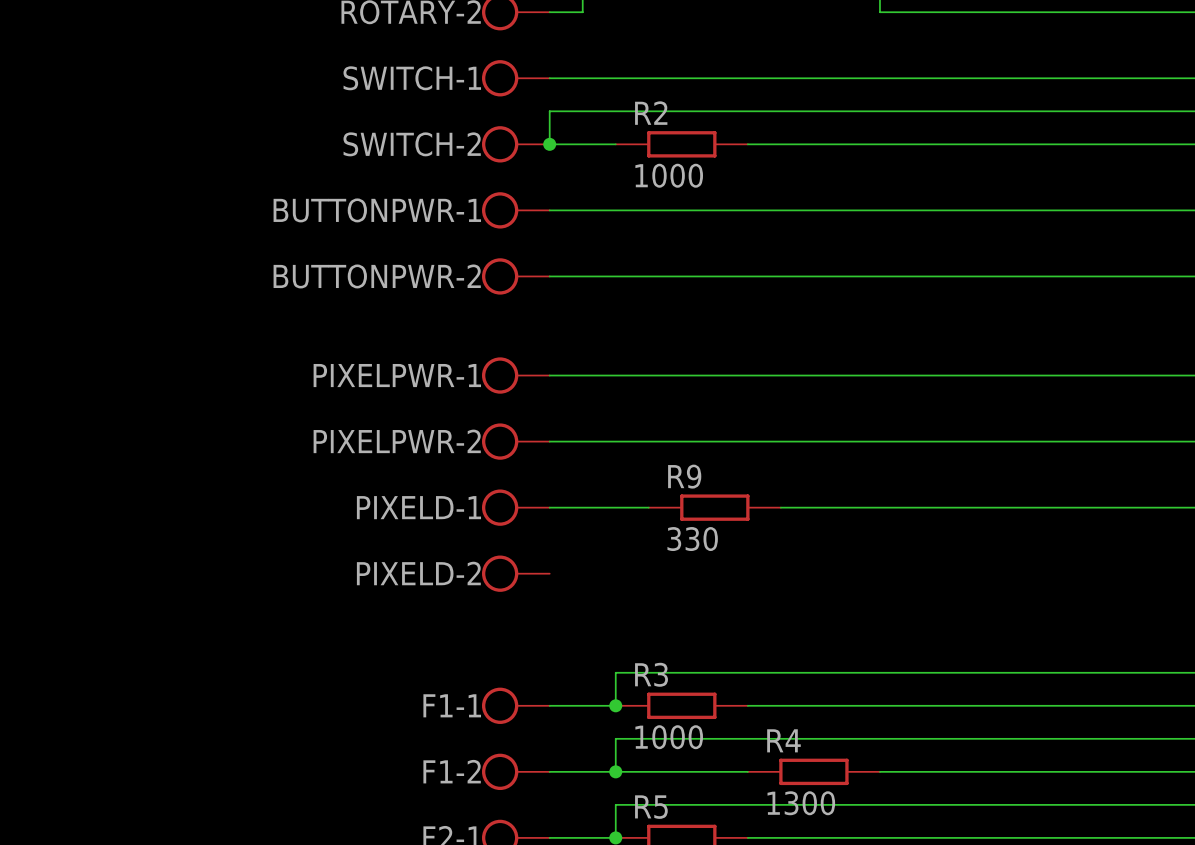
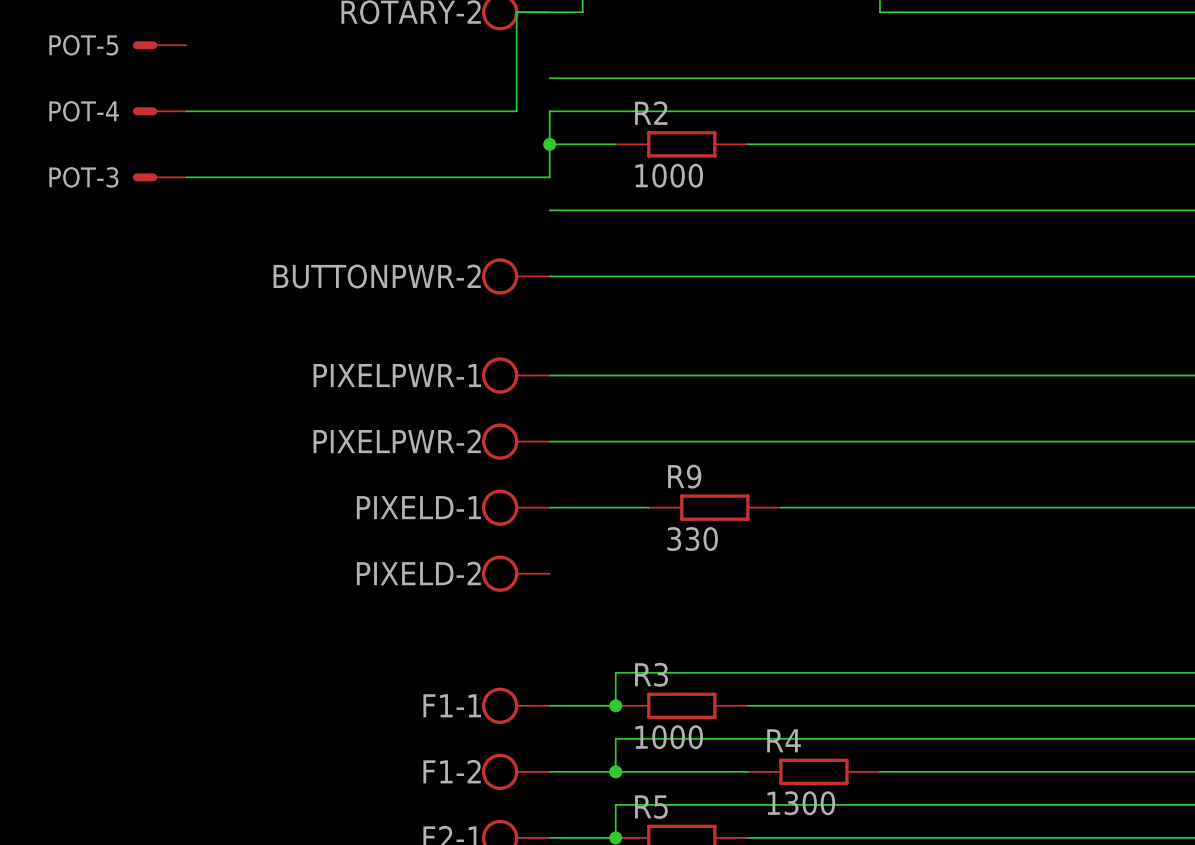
wire: none -> (549, 12) (516, 12) (516, 111) (186, 111)
POT-5: none -> (159, 45)
SWITCH-1: (515, 78) -> none
POT-4: none -> (159, 111)
SWITCH-2: (515, 144) -> none
wire: none -> (549, 144) (549, 177) (186, 177)
POT-3: none -> (159, 177)
BUTTONPWR-1: (515, 210) -> none

